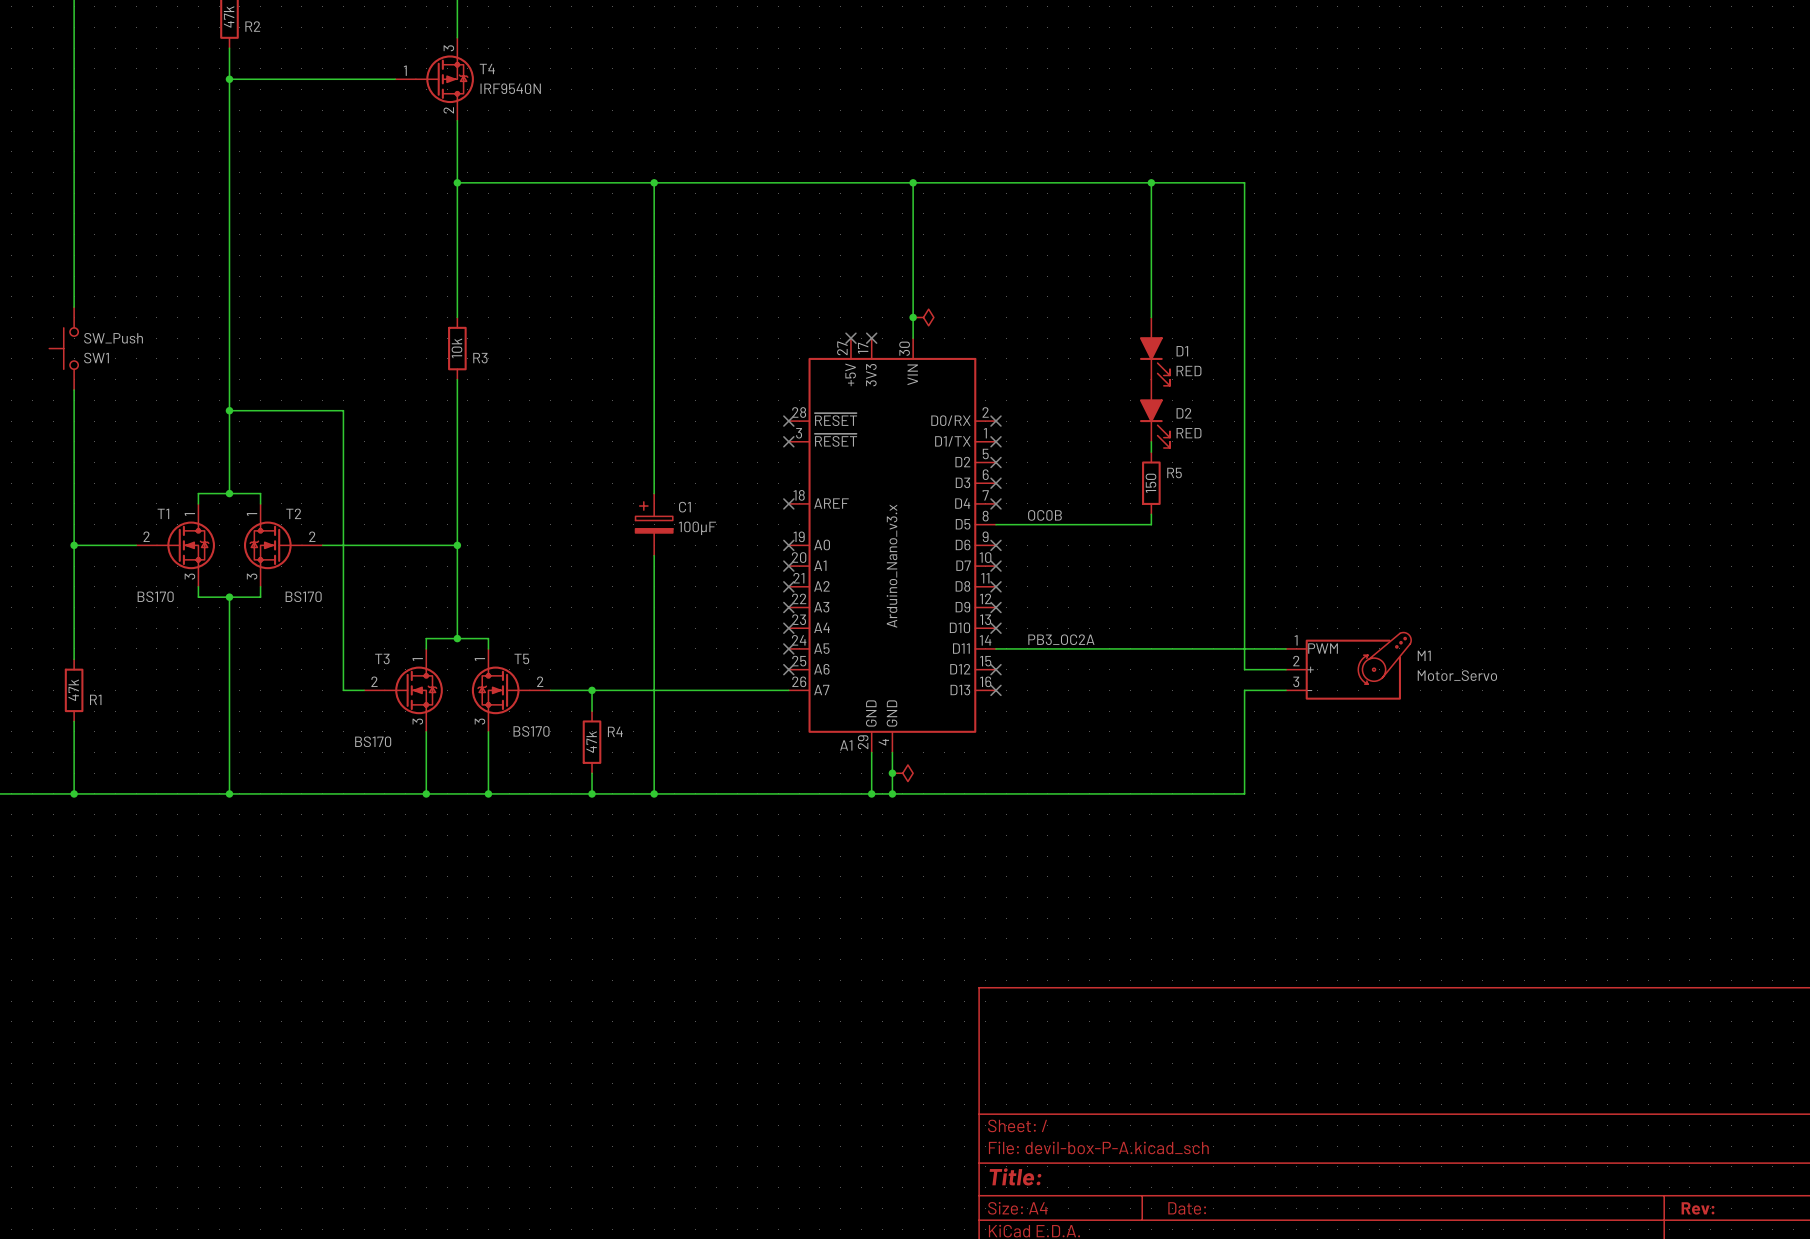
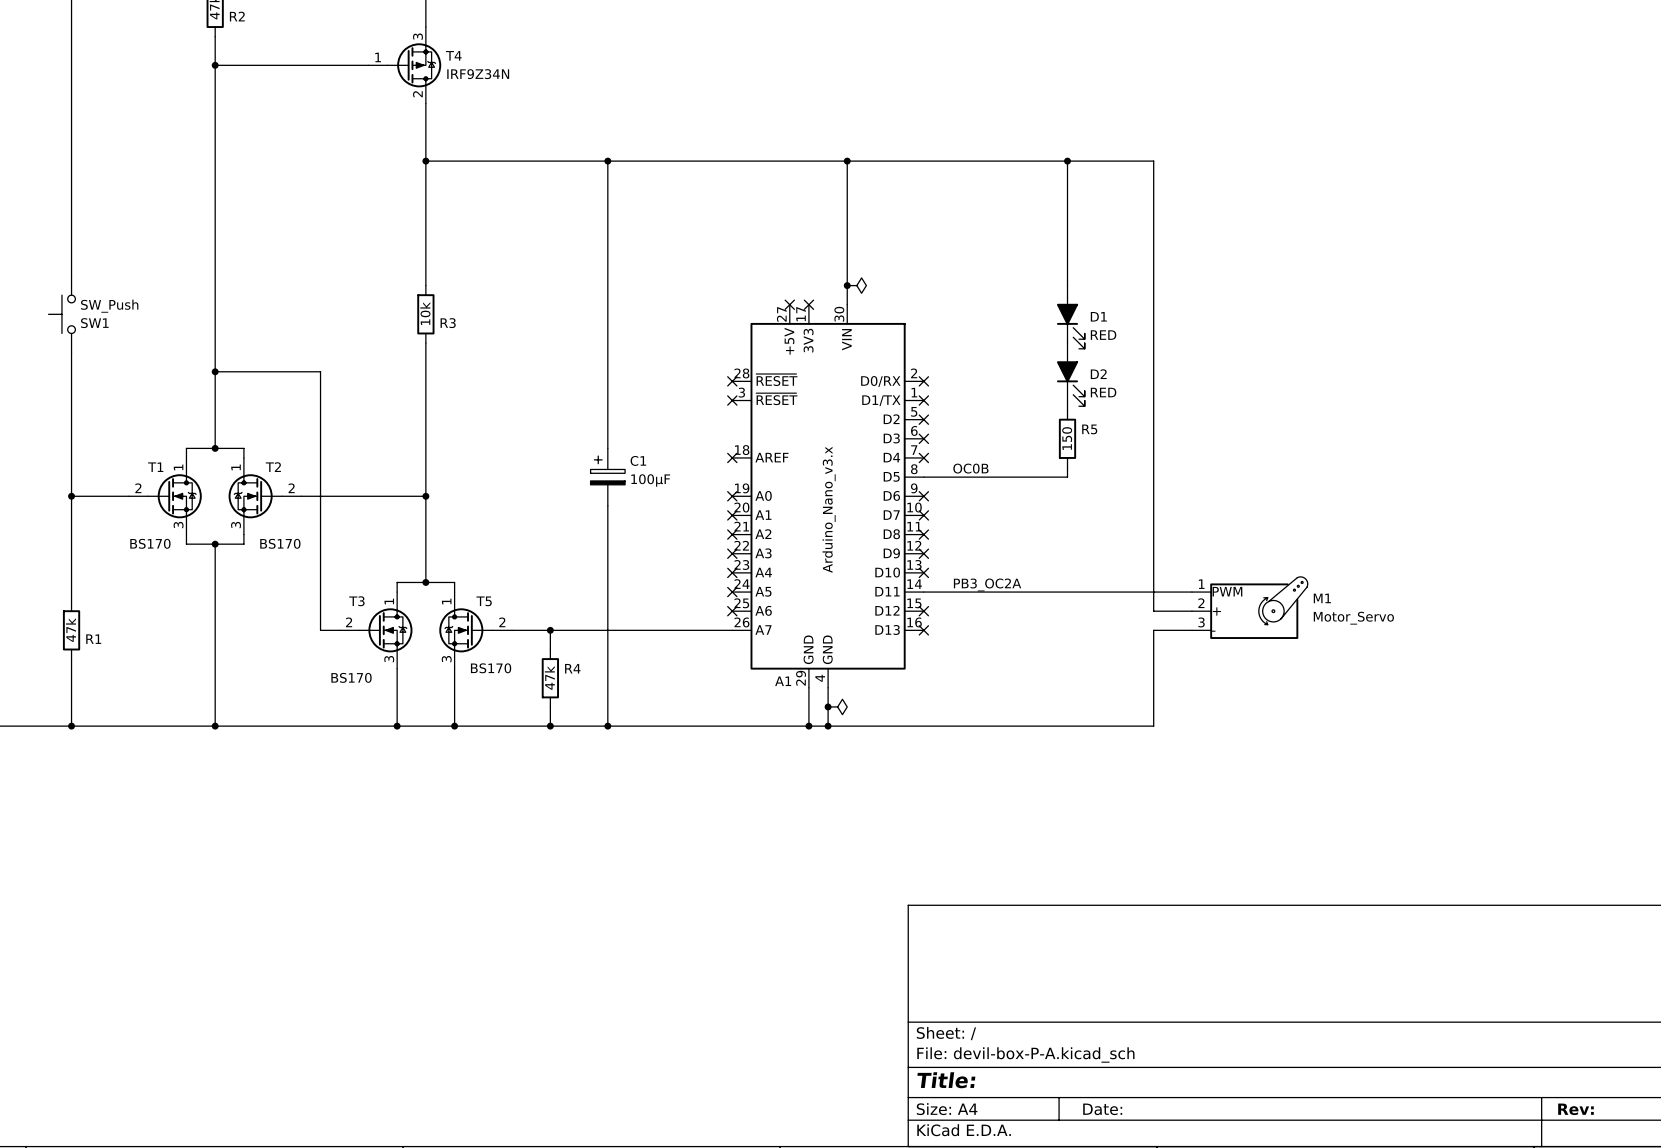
T4 value: IRF9540N (510, 88) -> IRF9Z34N (478, 74)

